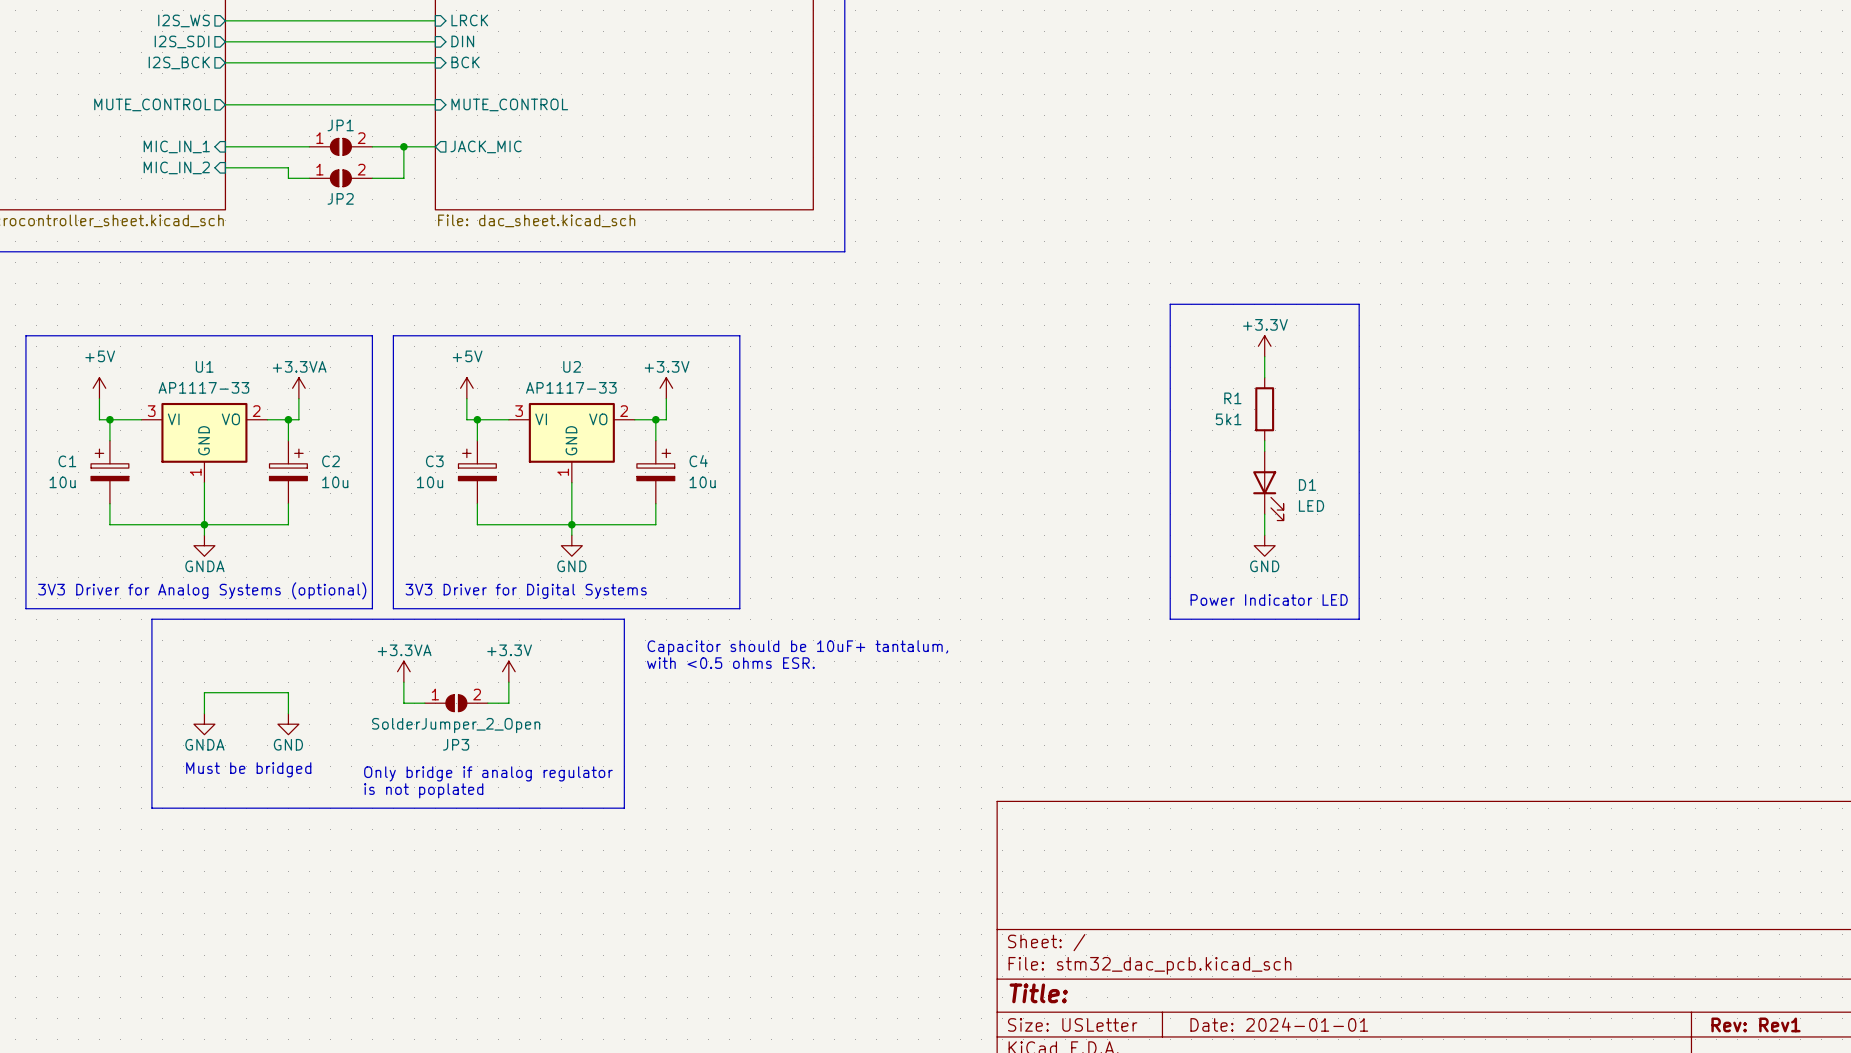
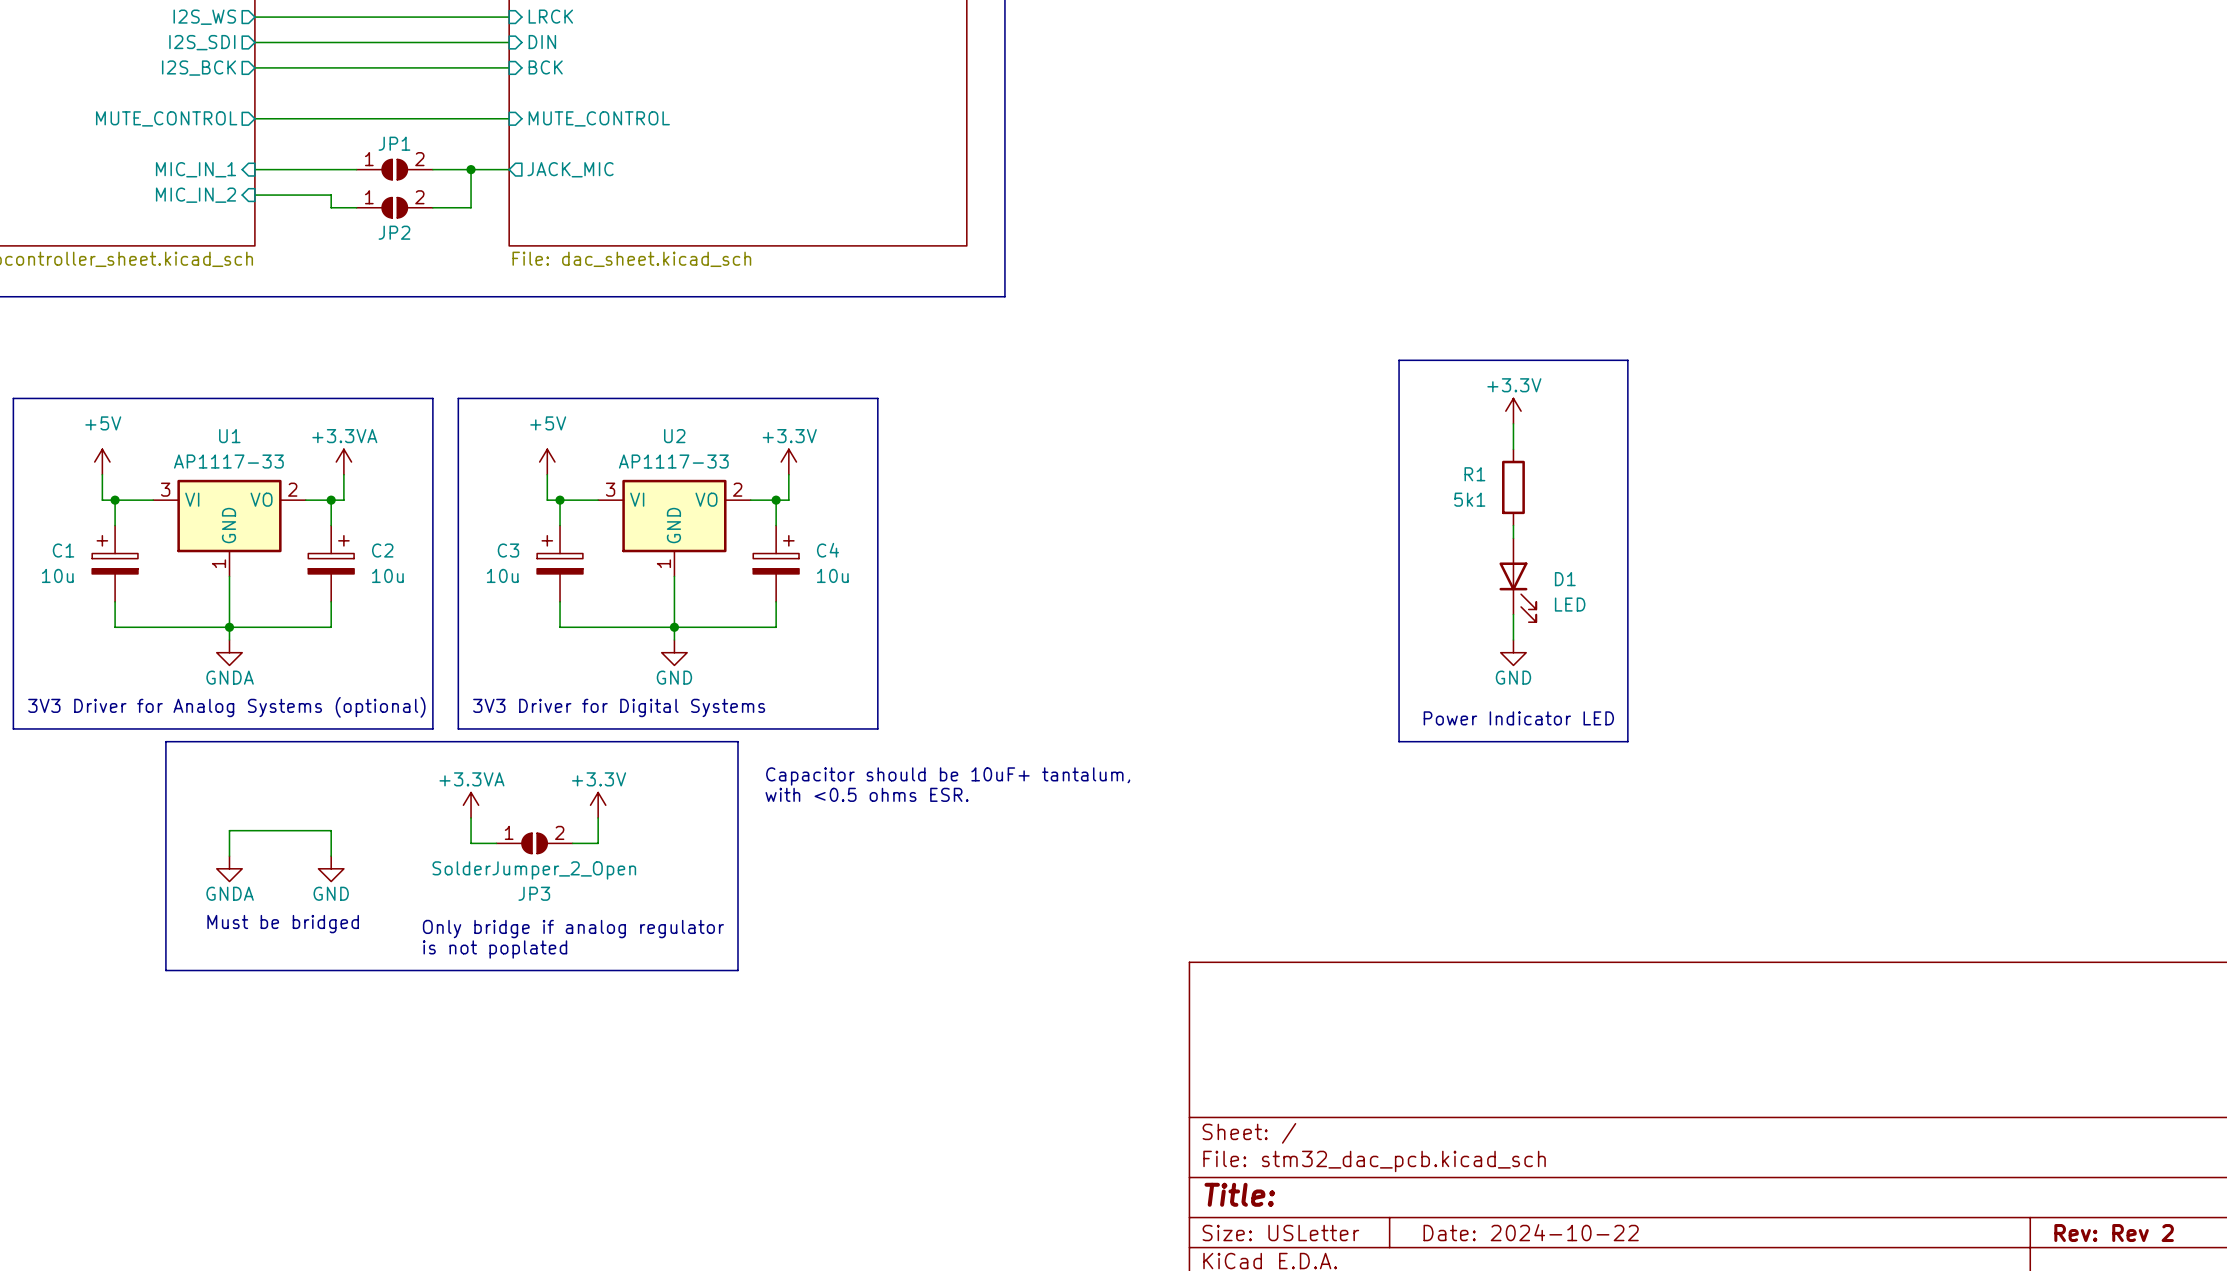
title block: Date: 2024-01-01 (1279, 1024) -> Date: 2024-10-22 (1531, 1232)
title block: Rev: Rev1 (1755, 1024) -> Rev: Rev 2 (2114, 1233)

